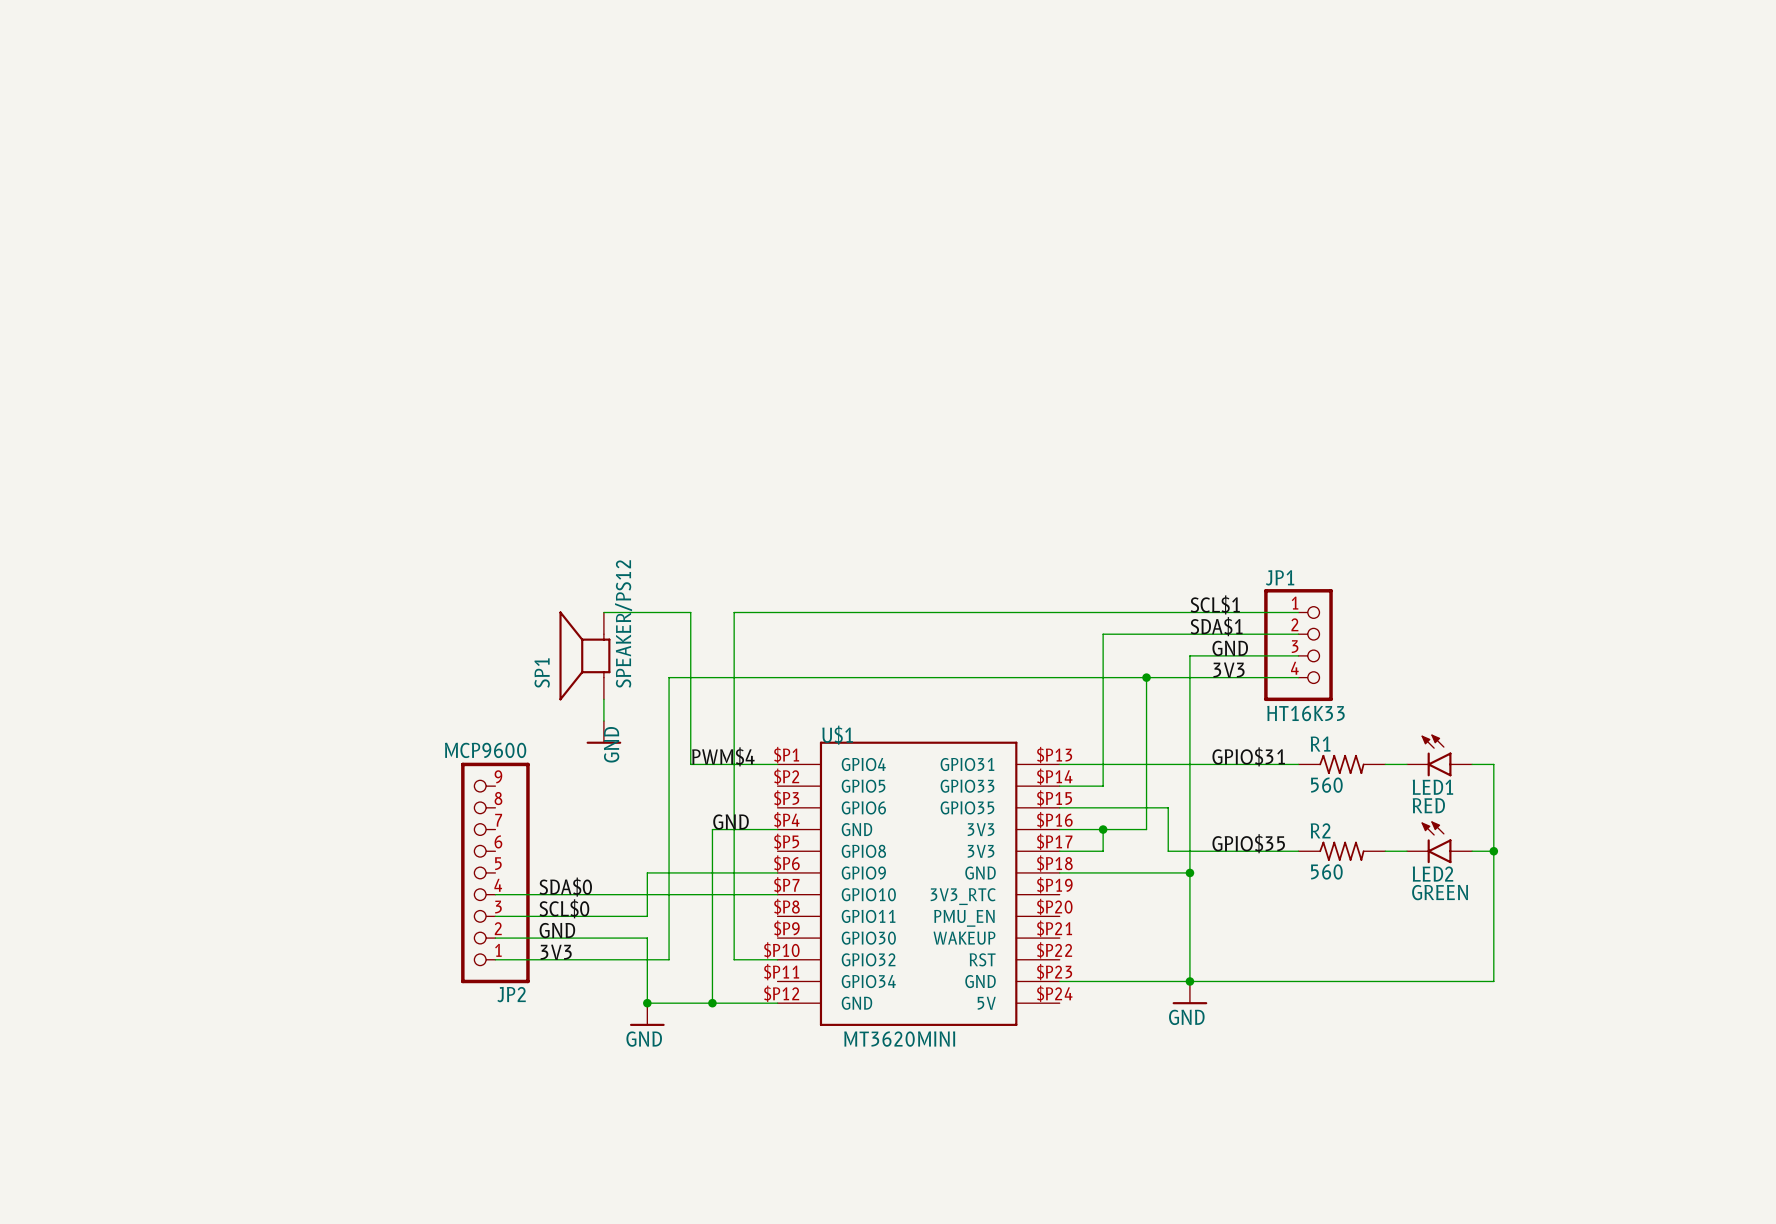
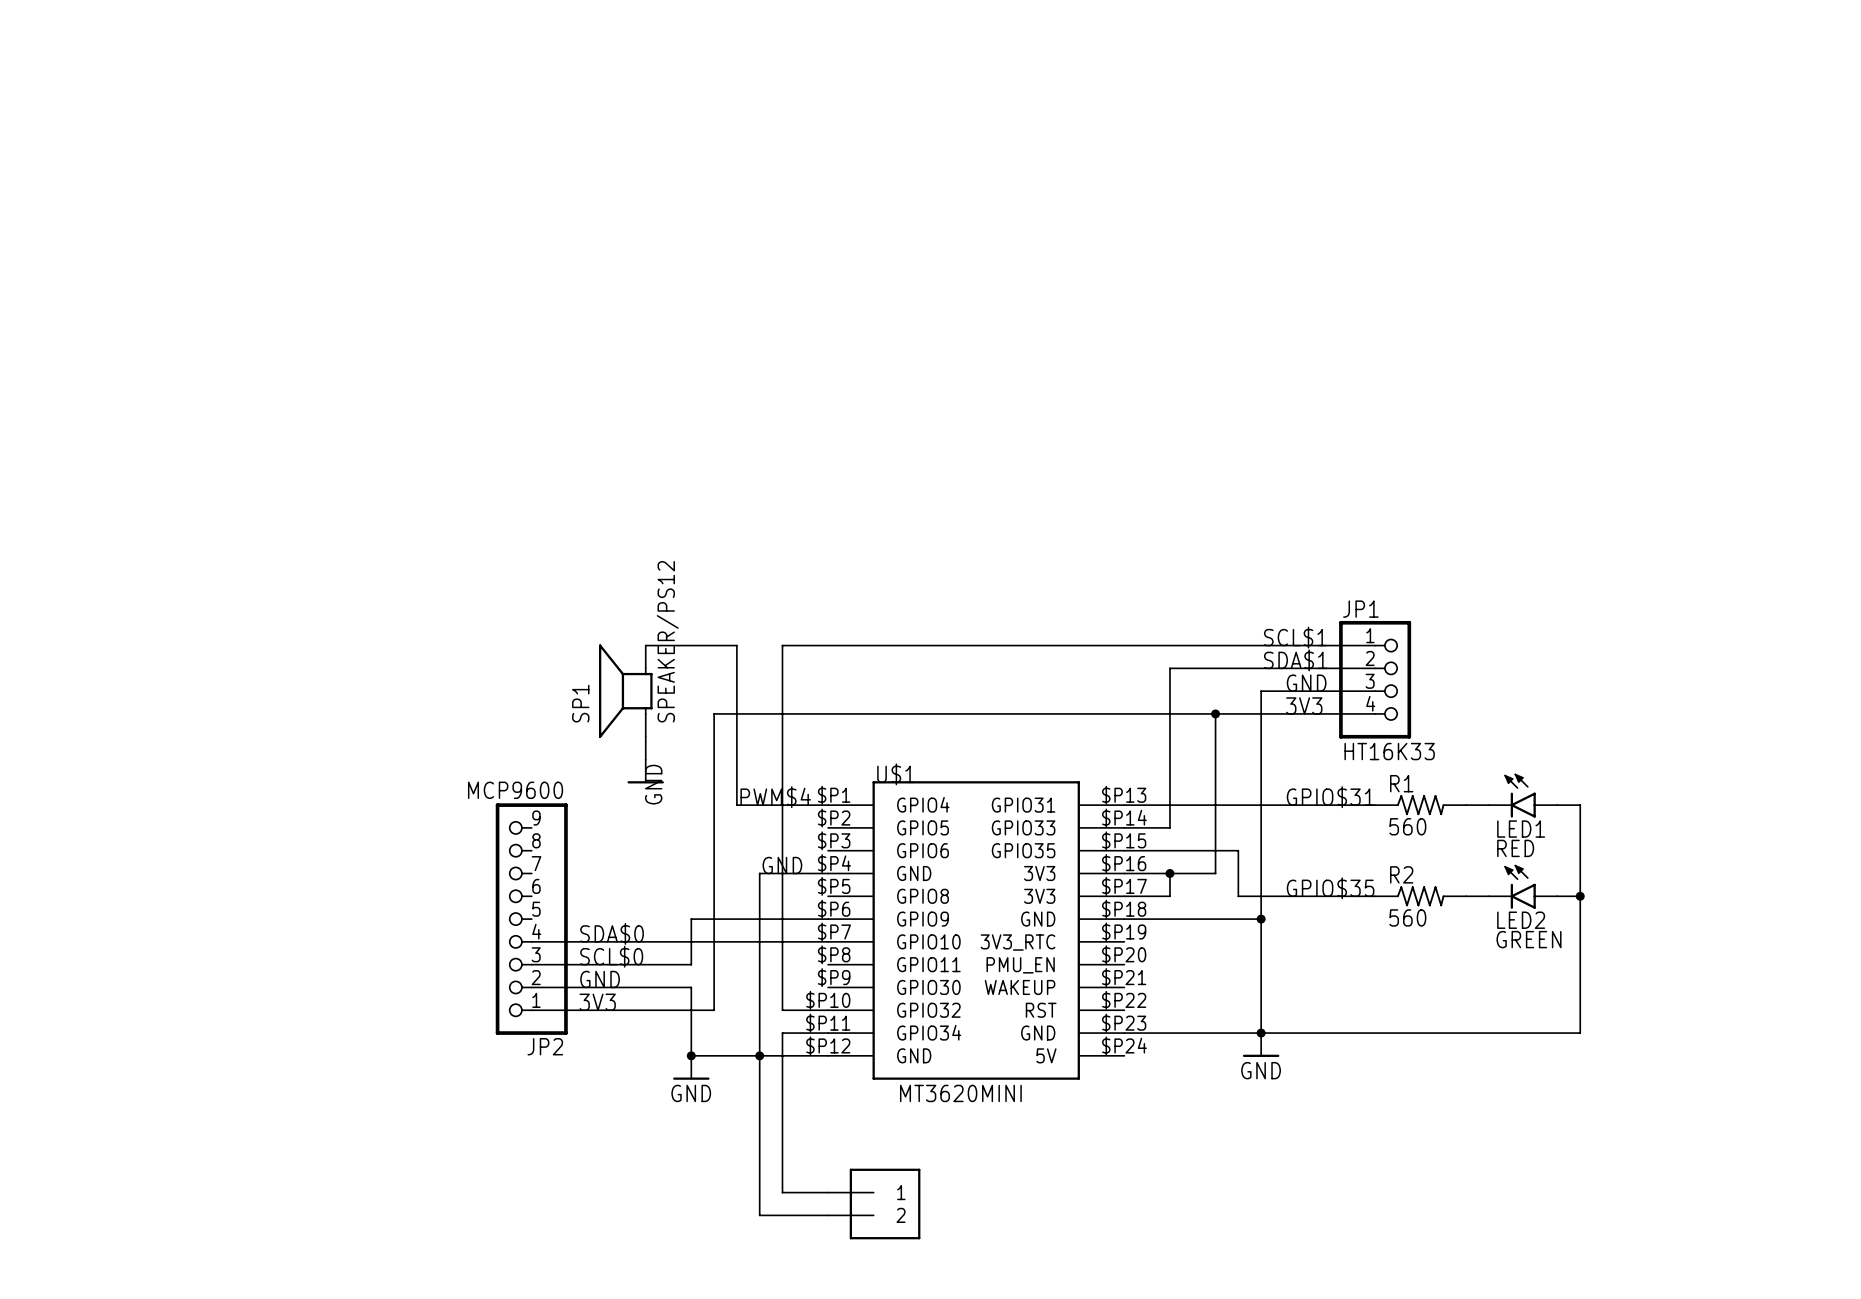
wire: none -> (828, 1033) (782, 1033) (782, 1192) (828, 1192)
wire: none -> (759, 1055) (759, 1215) (828, 1215)
part: none -> (874, 1203)

